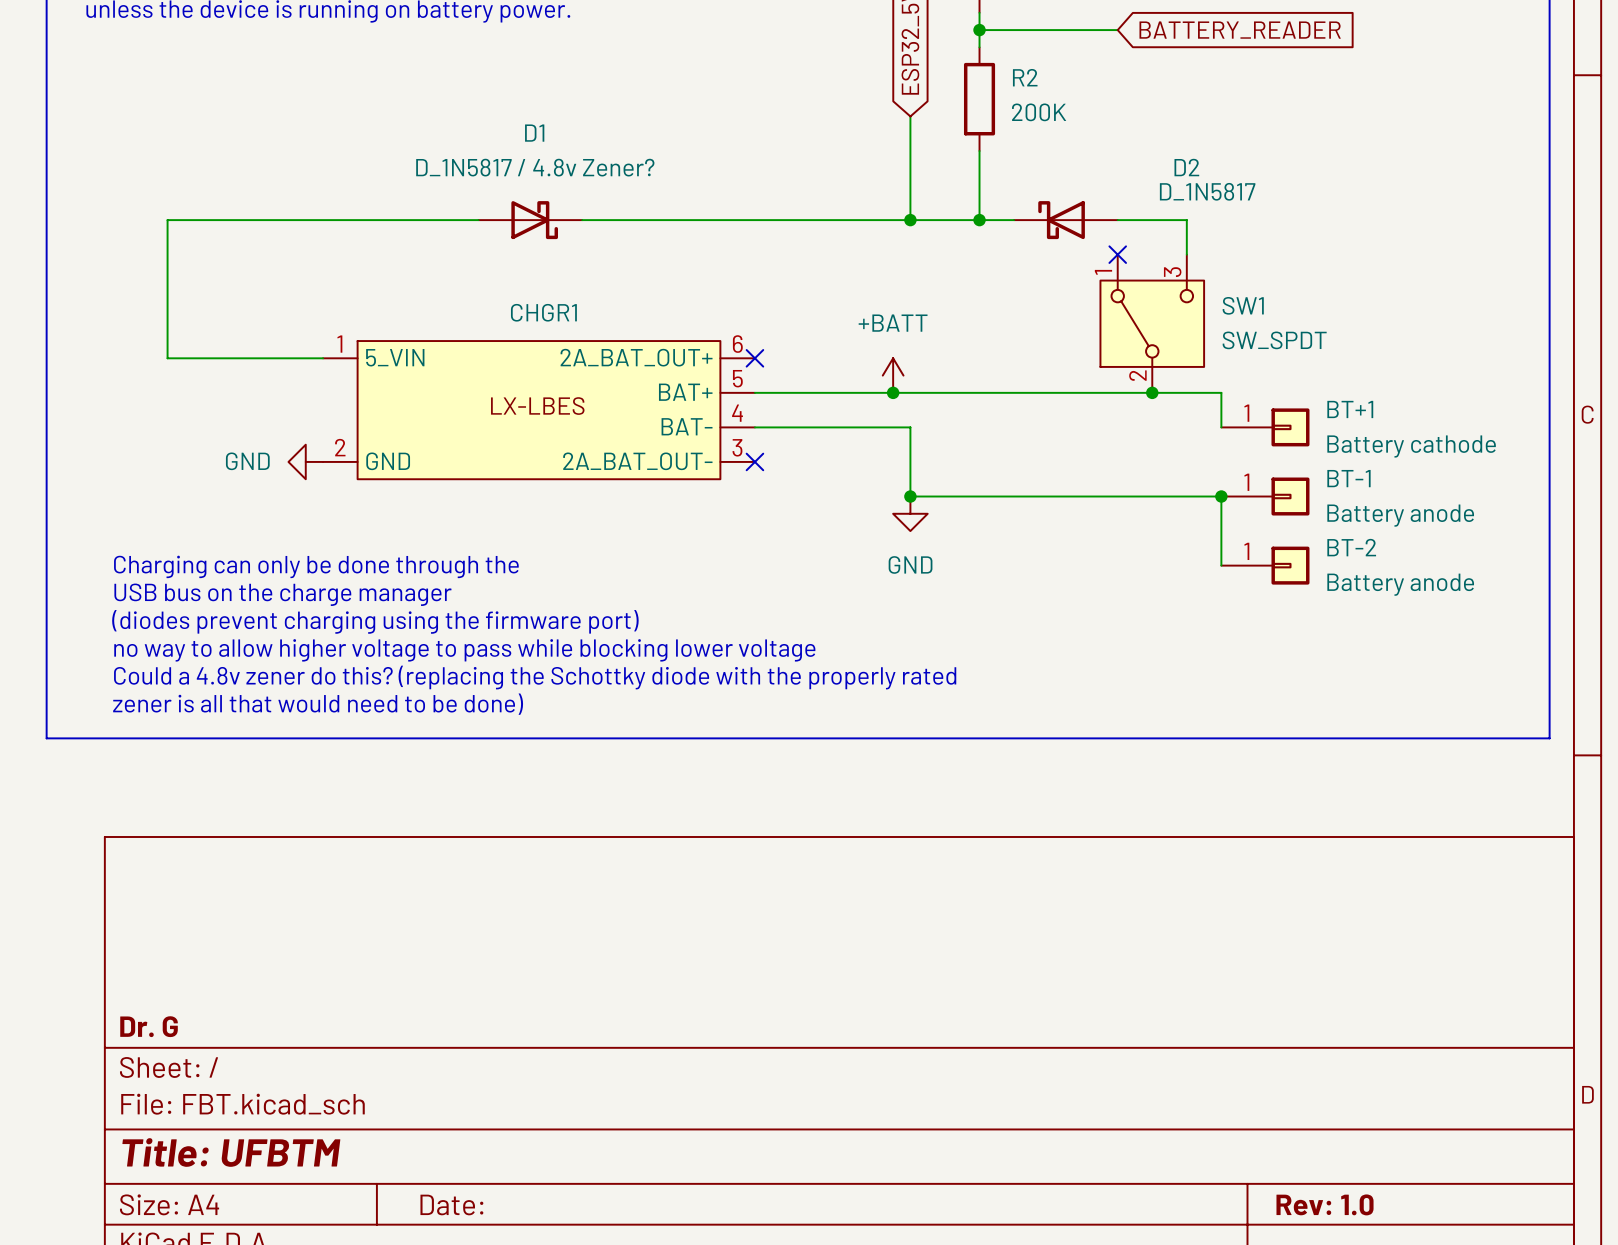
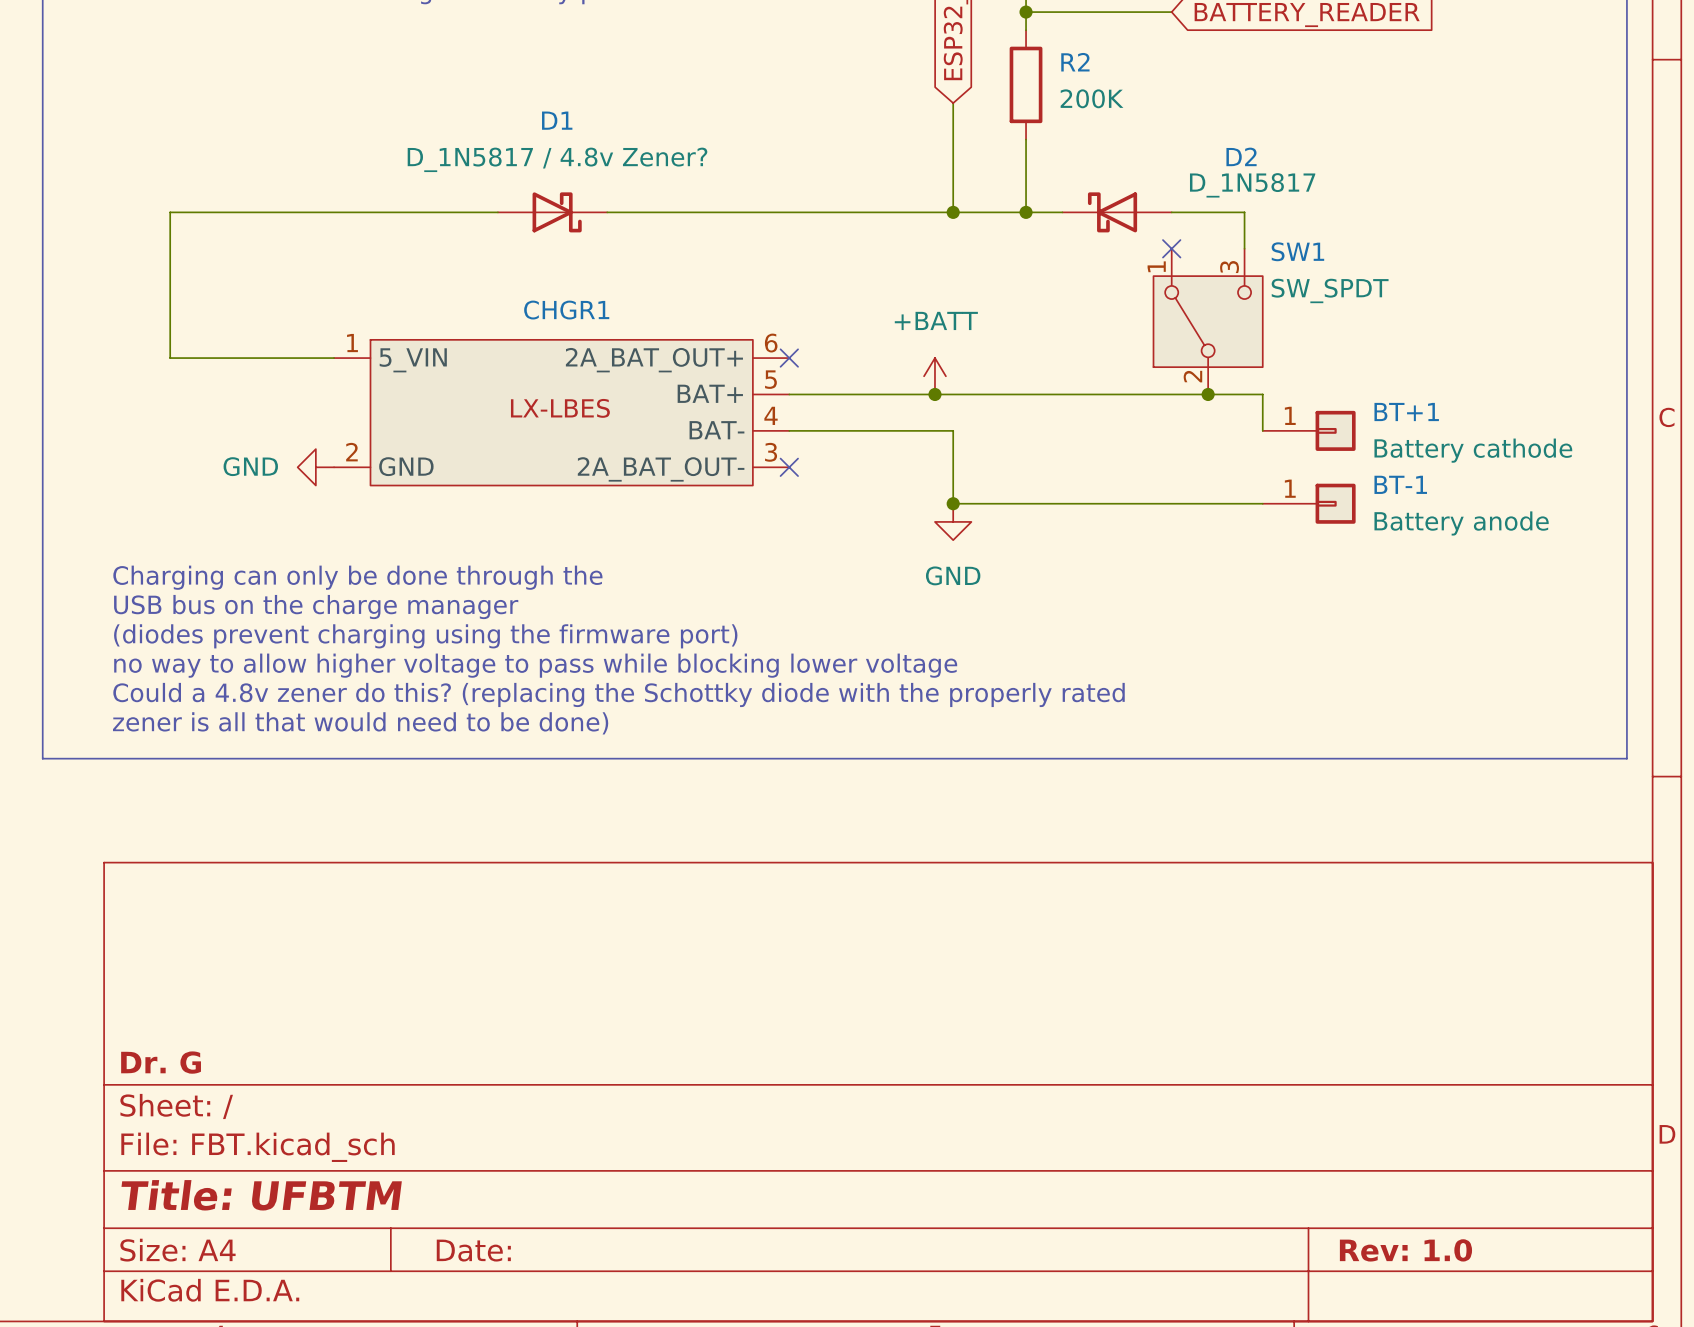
SW1 name position: SW1 (1243, 305) -> SW1 (1297, 251)
SW1 value position: SW_SPDT (1274, 340) -> SW_SPDT (1330, 290)
wire: (1204, 392) (1221, 392) (1221, 427) -> (1262, 394) (1262, 430)
BT+1 position: (1265, 427) -> (1309, 430)
wire: (1204, 496) (1221, 496) (1221, 565) -> none
junction: (1221, 496) -> none
BT-1 position: (1265, 496) -> (1309, 503)
BT-2: Battery anode (1265, 565) -> none

